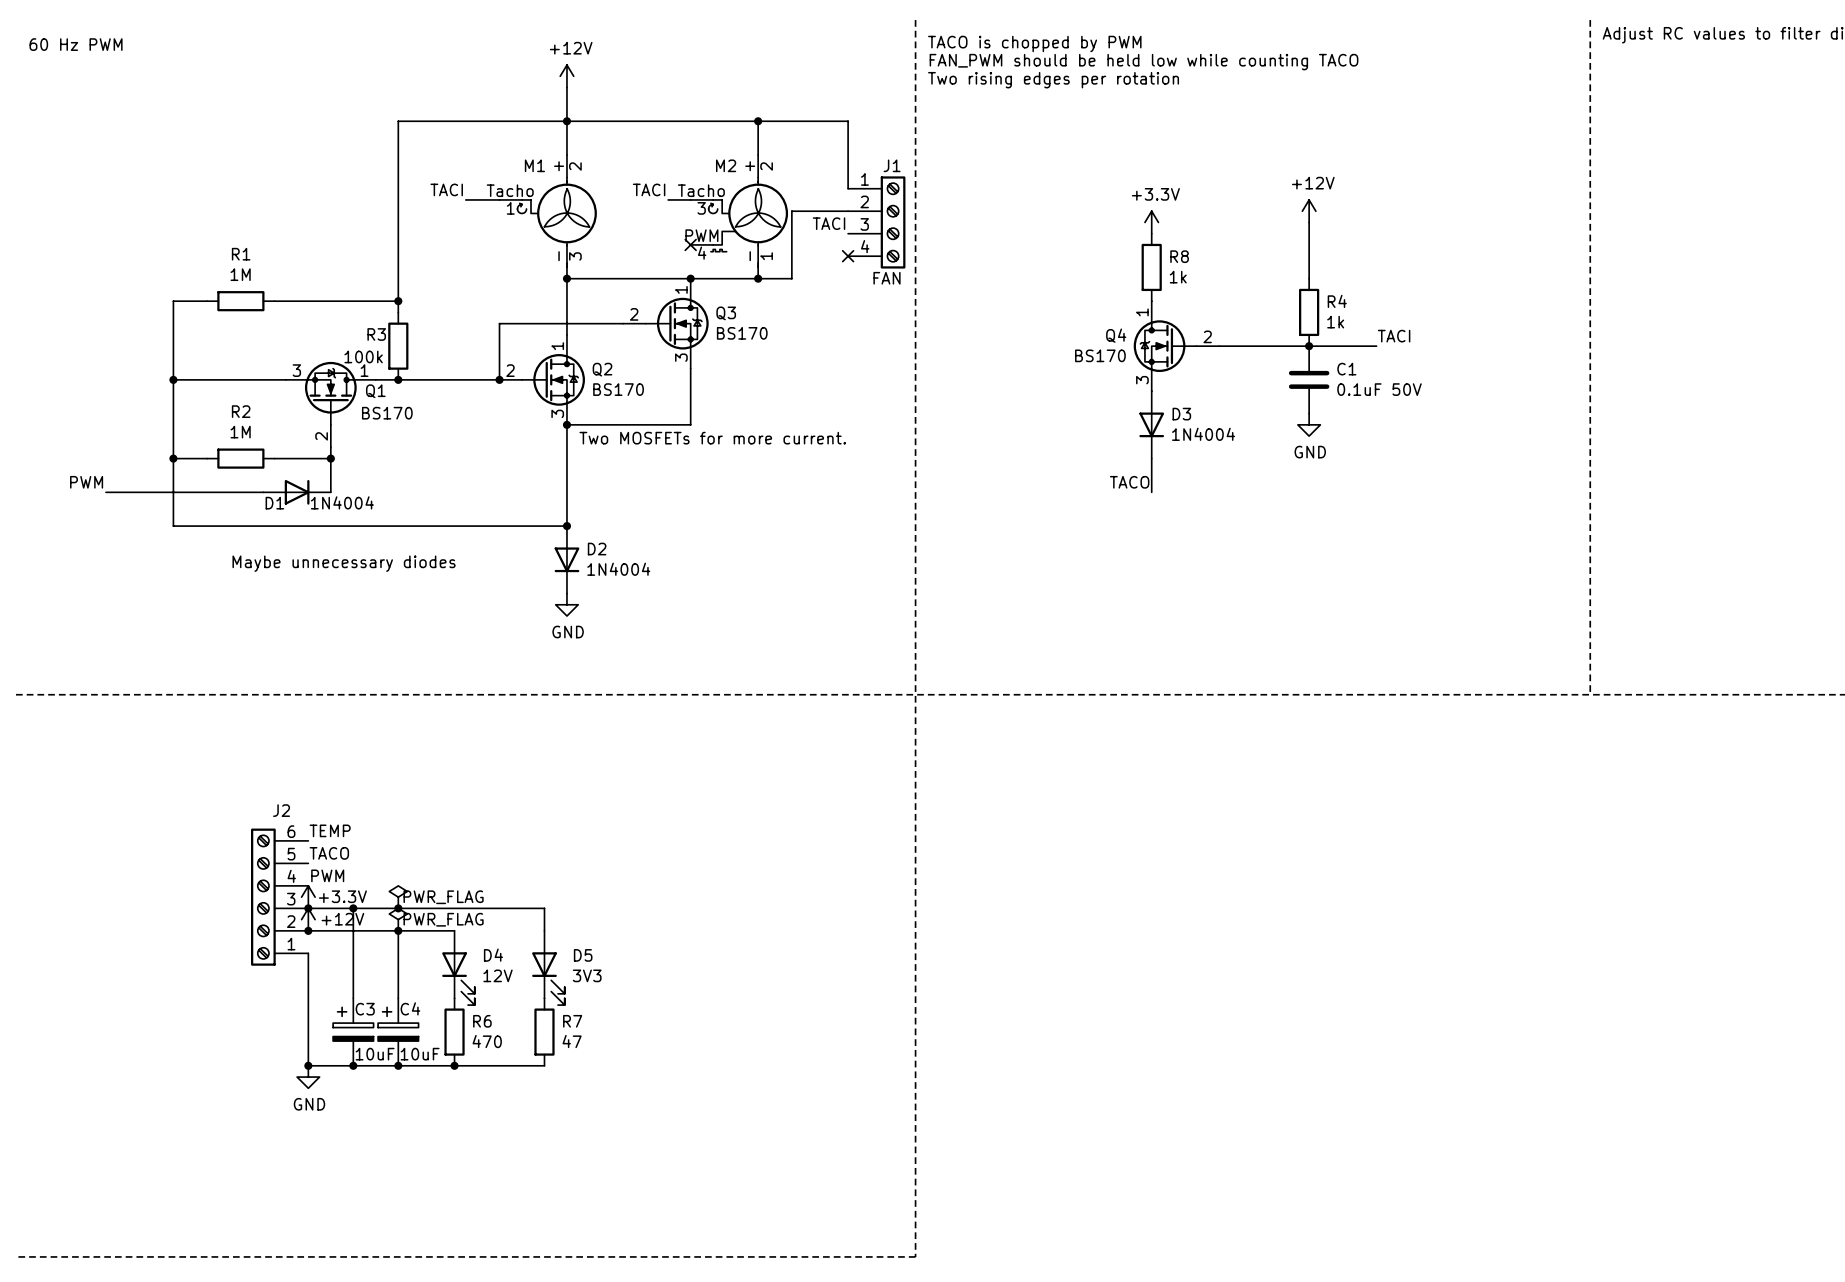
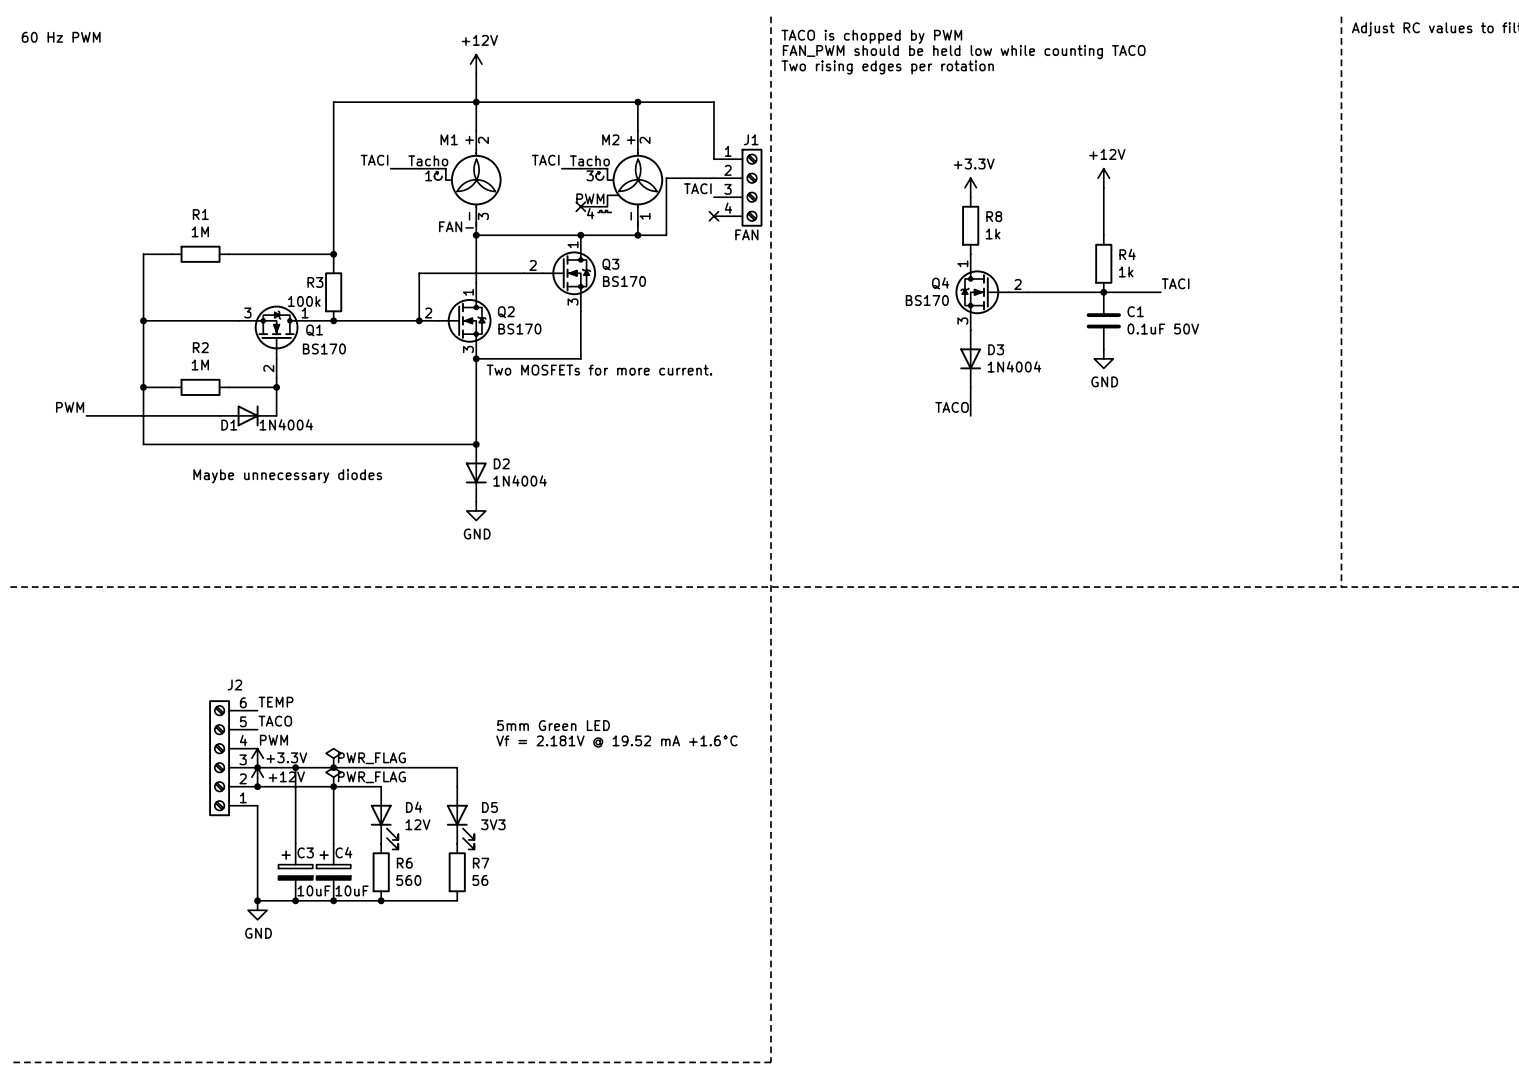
label: none -> FAN- (456, 226)
text: none -> 5mm Green LED (553, 725)
text: none -> Vf = 2.181V @ 19.52 mA +1.6°C (616, 741)
R6 value: 470 (487, 1041) -> 560 (408, 880)
R7 value: 47 (572, 1041) -> 56 (480, 880)

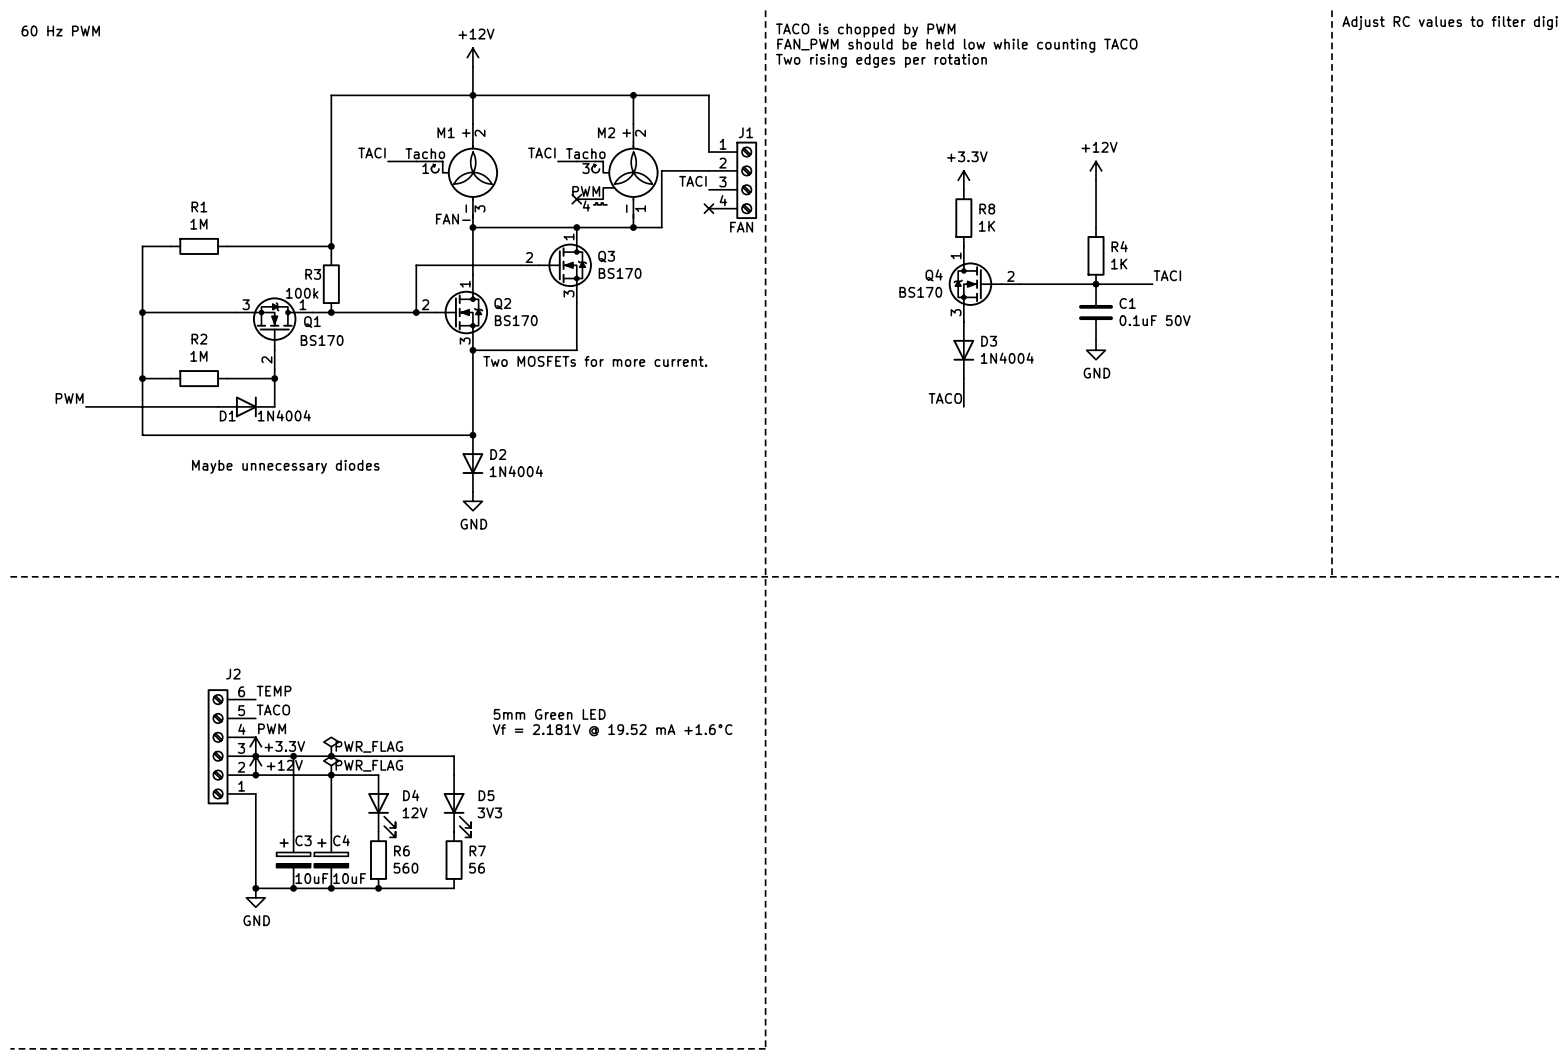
R8 value: 1k (993, 233) -> 1K (987, 226)
R4 value: 1k (1126, 271) -> 1K (1119, 264)

